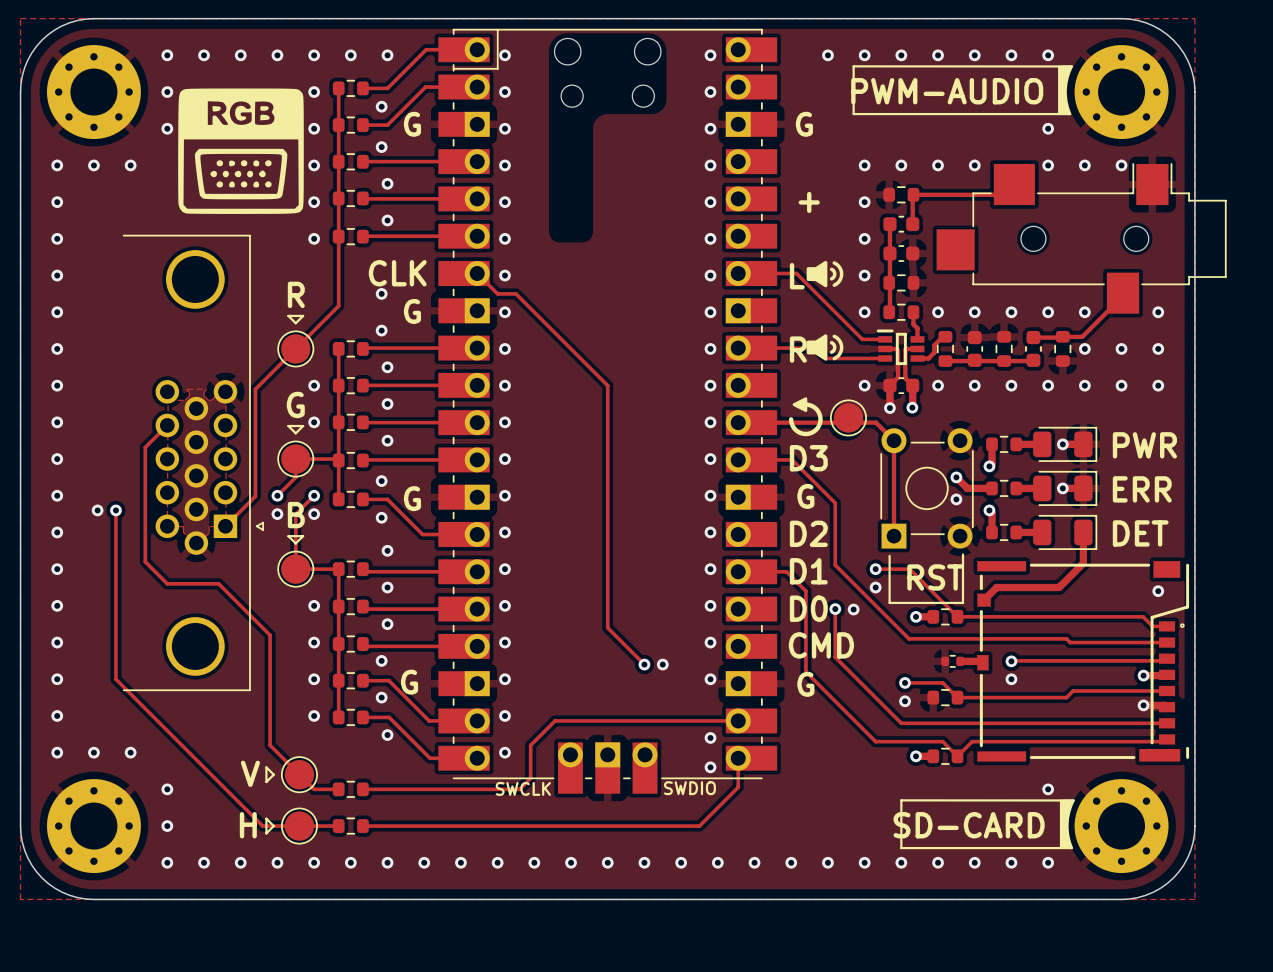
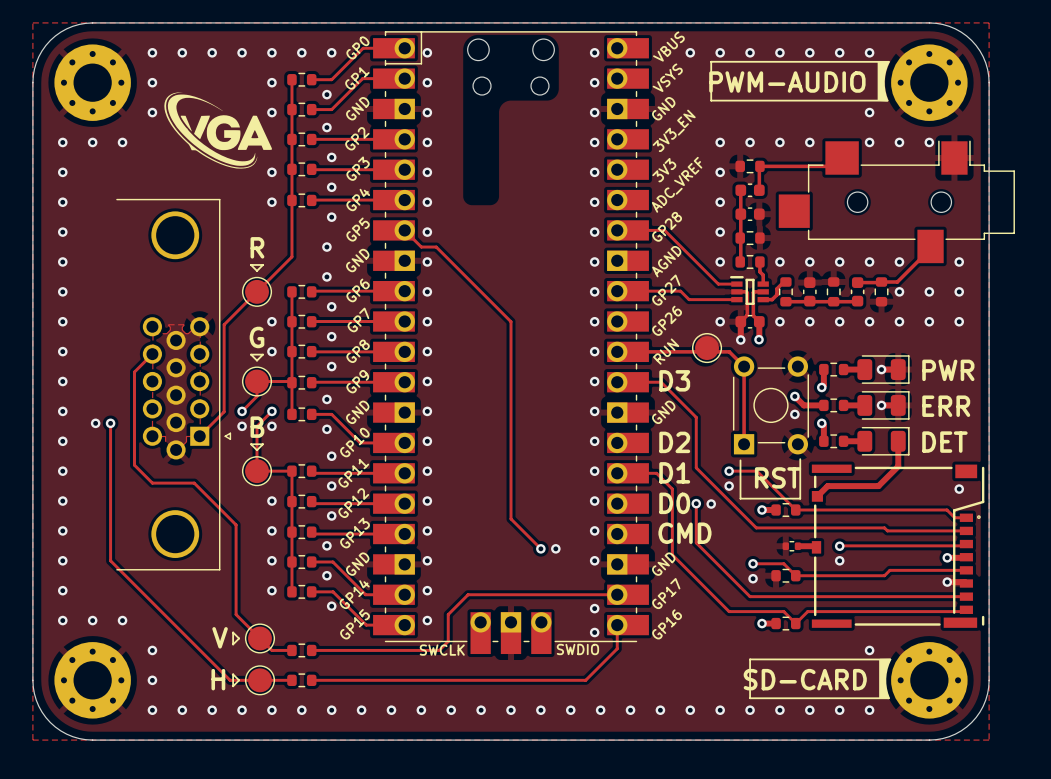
part footprint: [438, 28, 778, 794] -> [373, 31, 649, 655]
drawing shape: [178, 88, 304, 214] -> [164, 92, 272, 169]
text: G (412, 124) -> none
text: G (804, 124) -> none
via: (314, 165) -> none
text: + (809, 202) -> none
via: none -> (331, 217)
drawing: [806, 260, 844, 288] -> none
text: CLK (397, 273) -> none
text: L (797, 276) -> none
text: G (412, 311) -> none
drawing: [806, 334, 844, 361] -> none
text: R (798, 349) -> none
drawing: [792, 397, 808, 412] -> none
line: (805, 404) (814, 407) (819, 413) (820, 421) (816, 429) (809, 433) (800, 432) (793, 426) (791, 419) -> none
text: G (805, 496) -> none
text: G (412, 498) -> none
text: G (409, 682) -> none
text: G (805, 684) -> none

